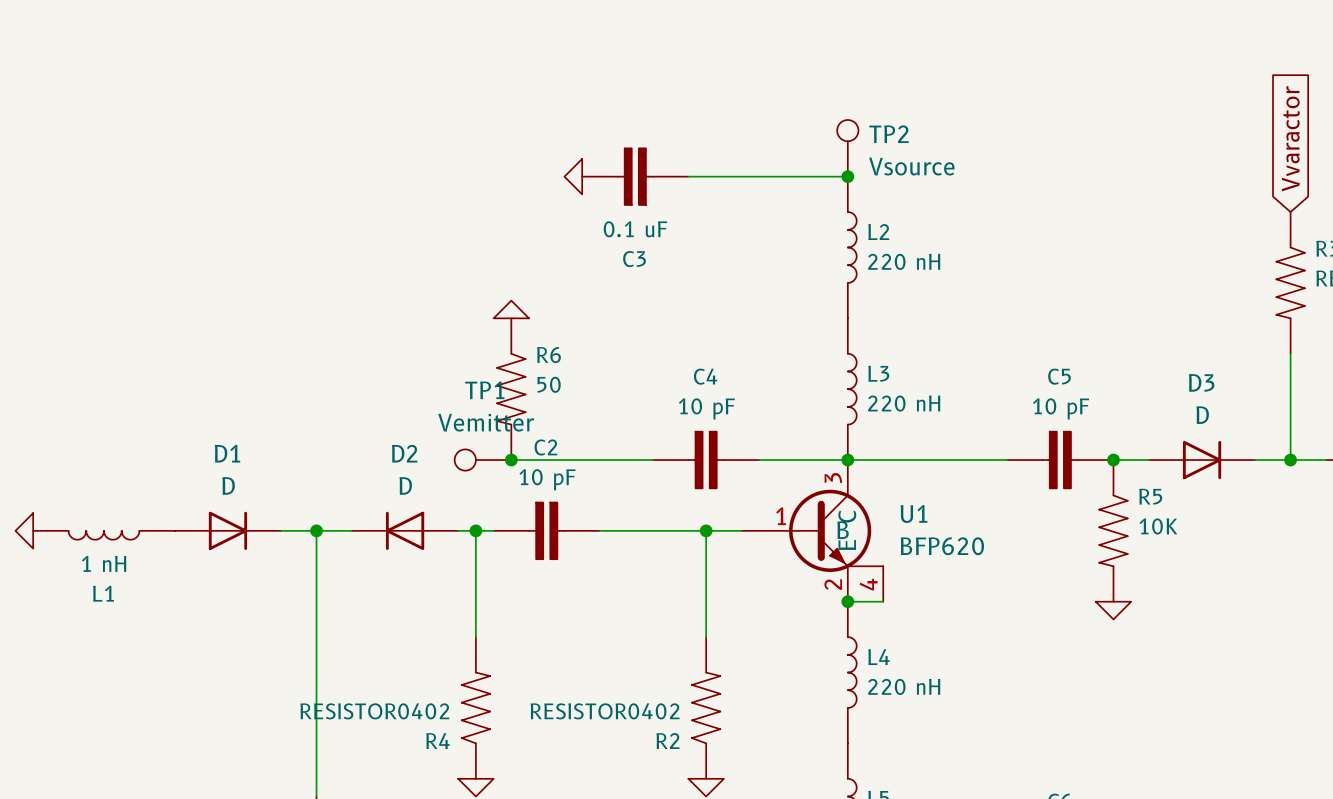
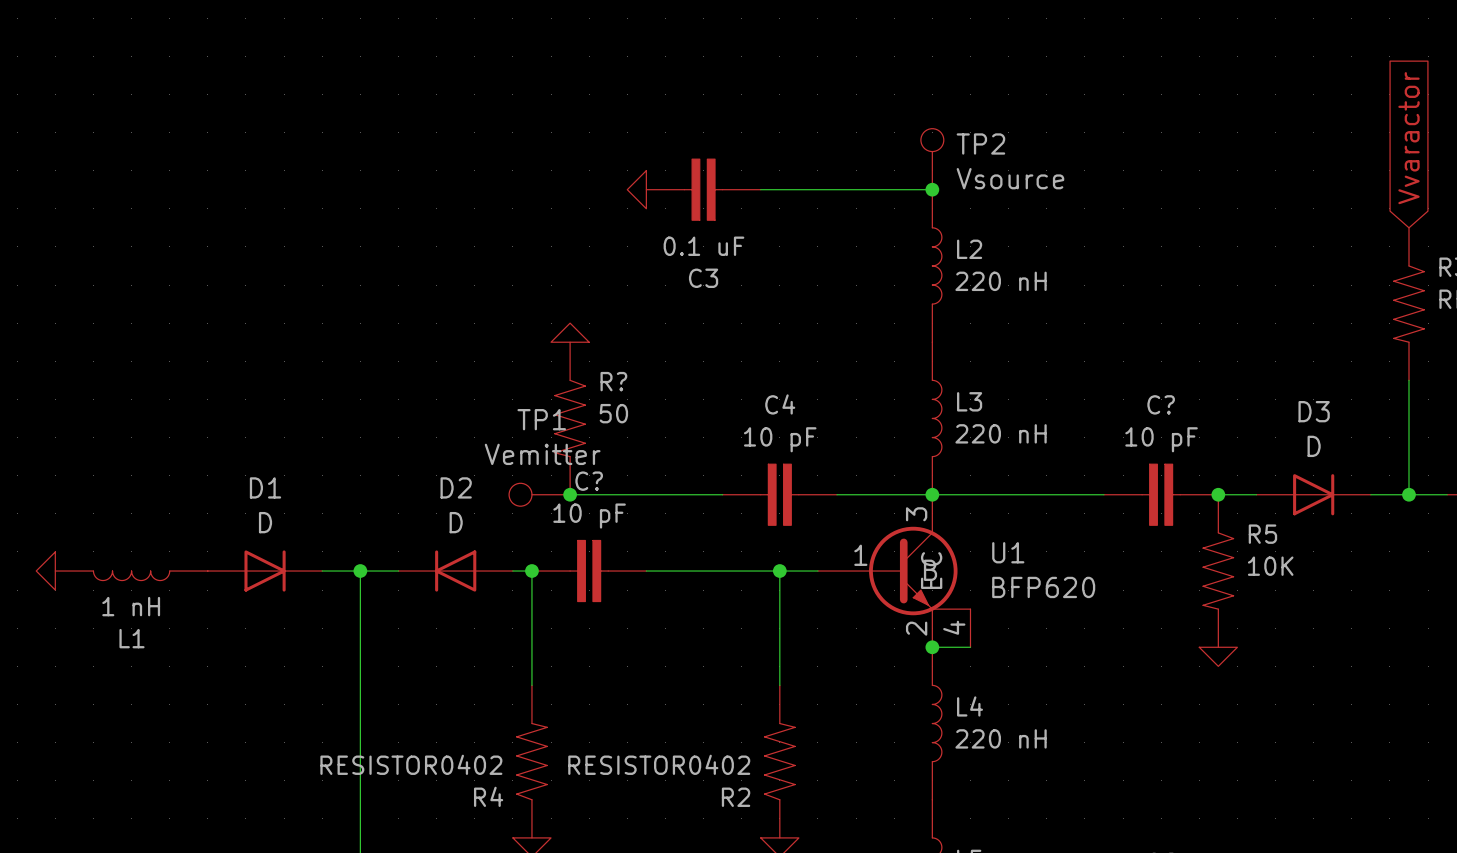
R6 name: R6 (548, 355) -> R? (613, 381)
C5 name: C5 (1059, 376) -> C? (1161, 404)
C?: none -> 10 pF (589, 571)
C2: 10 pF (546, 530) -> none

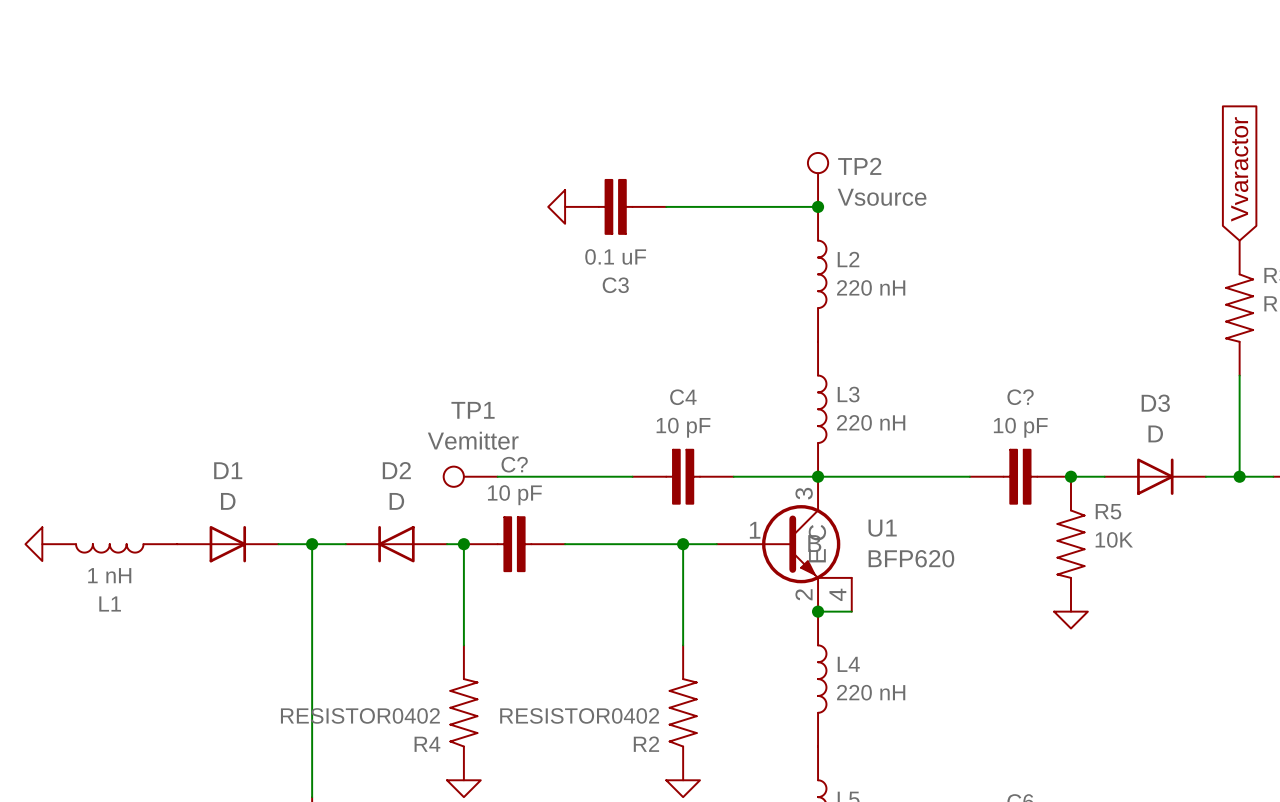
power symbol: (570, 332) -> none
R?: 50 (570, 418) -> none
junction: (570, 494) -> none

